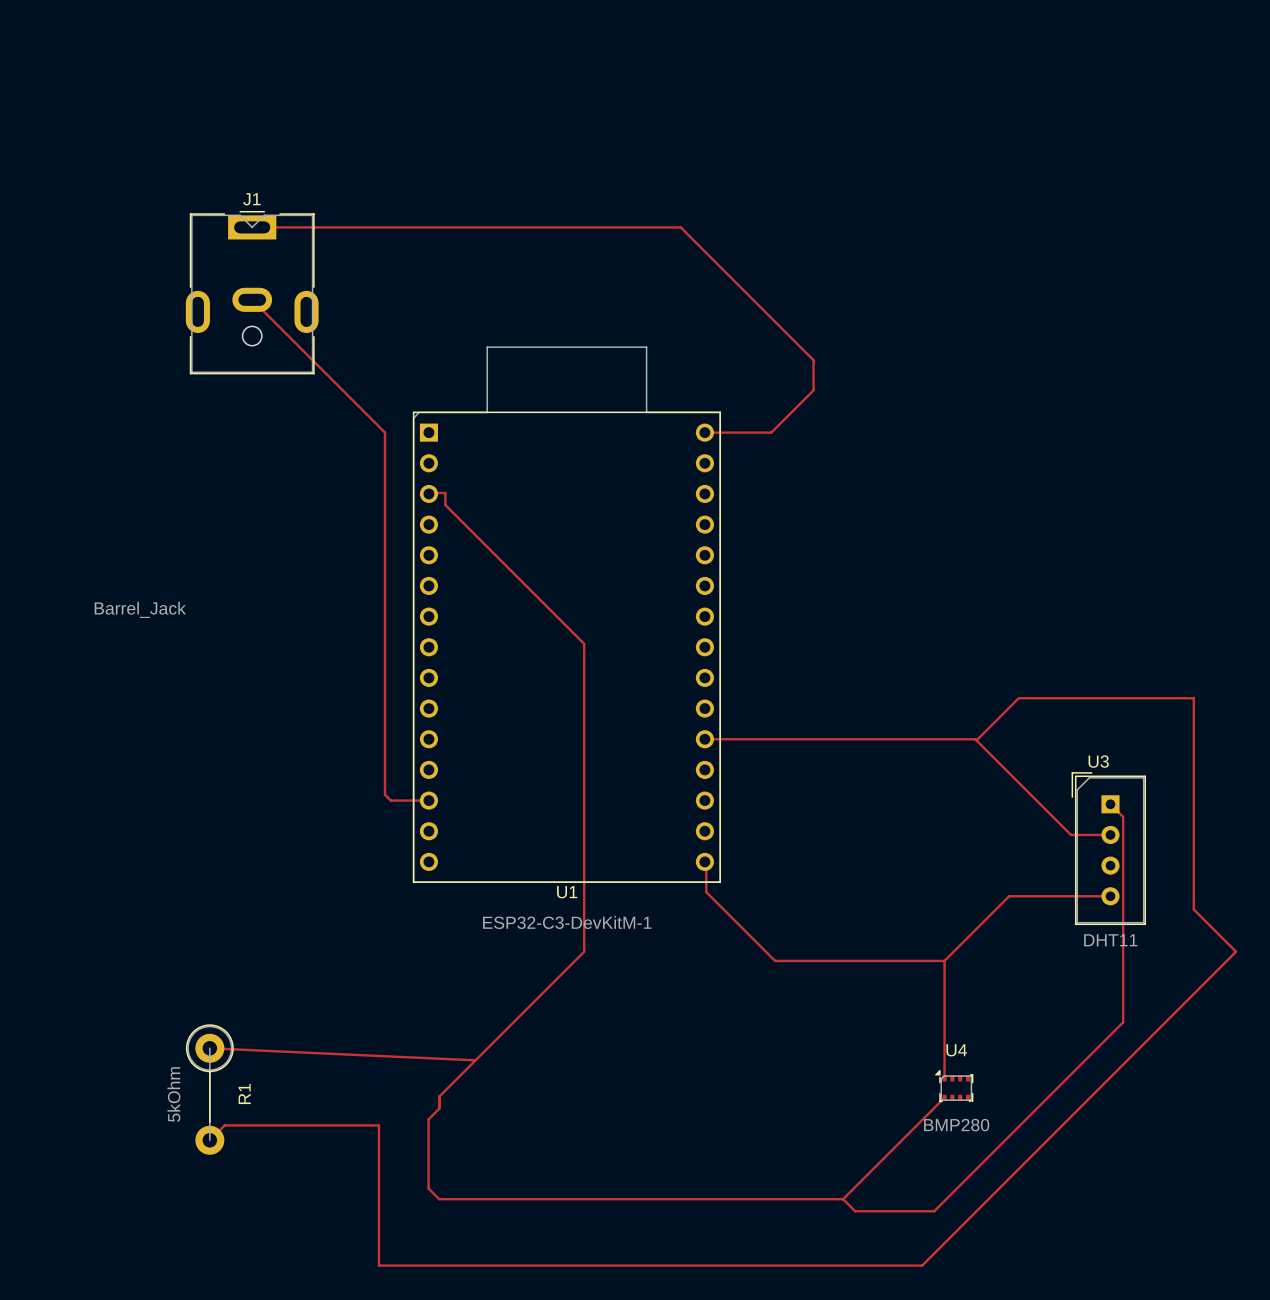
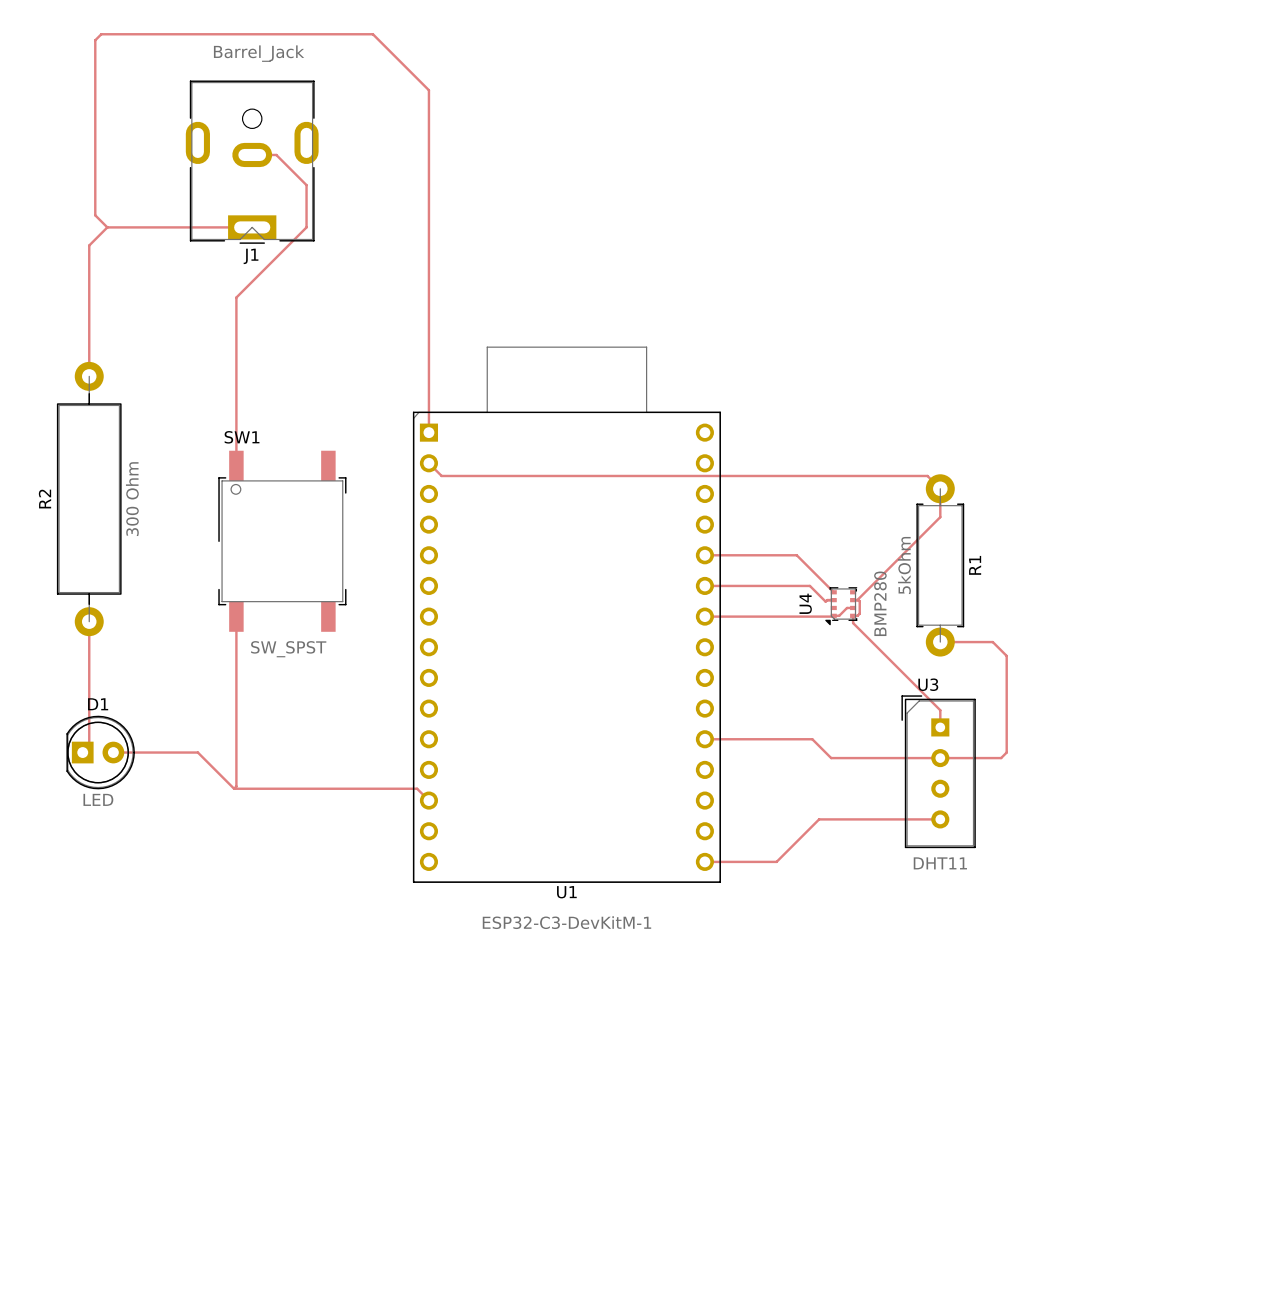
top track: none -> (252, 154) (276, 154) (306, 185) (306, 227) (236, 297) (236, 465)
top track: none -> (107, 227) (252, 227)
top track: none -> (107, 227) (95, 215) (95, 40) (101, 34) (372, 34) (428, 90) (428, 432)
top track: none -> (107, 227) (89, 245) (89, 376)
top track: (264, 227) (680, 227) (813, 360) (813, 390) (771, 432) (704, 432) -> none
J1 rotation: 0° (252, 292) -> 180° (252, 162)
J1 position: (252, 292) -> (252, 162)
top track: (252, 299) (385, 432) (385, 794) (390, 800) (428, 800) -> (234, 788) (417, 788) (428, 800)
top track: none -> (428, 463) (441, 475) (927, 475) (940, 488) (940, 517) (857, 600)
top track: (427, 492) (445, 492) (445, 505) (584, 643) (584, 951) (439, 1096) (439, 1108) (428, 1119) (428, 1188) (439, 1199) (843, 1199) -> none
R2: none -> 300 Ohm (89, 499)
SW1: none -> SW_SPST (282, 541)
top track: none -> (704, 555) (796, 555) (833, 592)
top track: none -> (704, 585) (809, 585) (825, 601) (833, 600)
top track: none -> (853, 600) (859, 601) (859, 613) (853, 615) (853, 623) (940, 710) (940, 727)
top track: none -> (853, 607) (847, 607) (839, 615) (832, 616) (704, 616)
J1 value position: Barrel_Jack (140, 609) -> Barrel_Jack (259, 53)
top track: none -> (236, 616) (236, 786) (234, 788)
top track: none -> (89, 621) (89, 746) (82, 752)
top track: (812, 739) (975, 739) (1071, 834) (1110, 834) -> (812, 739) (831, 758) (1001, 758) (1006, 752) (1006, 655) (992, 642) (940, 642)
top track: (976, 740) (1018, 698) (1193, 698) (1193, 909) (1236, 951) (922, 1265) (378, 1265) (378, 1125) (224, 1125) (209, 1140) -> none
D1: none -> LED (100, 752)
top track: none -> (113, 752) (197, 752) (234, 788)
top track: (1110, 804) (1123, 816) (1123, 1022) (934, 1211) (855, 1211) (843, 1199) -> none
top track: none -> (940, 819) (819, 819) (776, 861) (704, 861)
U3 position: (1108, 848) -> (938, 771)
top track: (706, 863) (706, 892) (775, 960) (944, 960) -> none
top track: (1110, 896) (1009, 896) (944, 960) -> none
top track: (944, 960) (944, 1078) -> none
R1 footprint: [185, 1024, 234, 1155] -> [916, 474, 965, 657]
top track: (209, 1048) (475, 1060) -> none
U4 rotation: 0° (954, 1085) -> 90° counterclockwise (841, 606)
U4 position: (954, 1085) -> (841, 606)
top track: (944, 1097) (843, 1199) -> none

